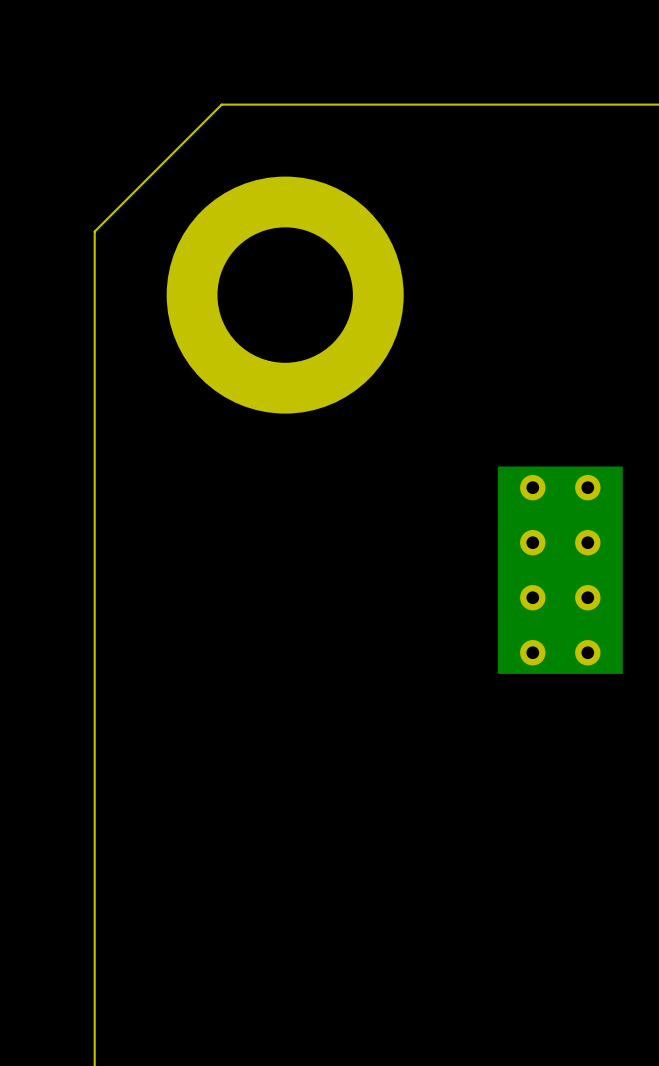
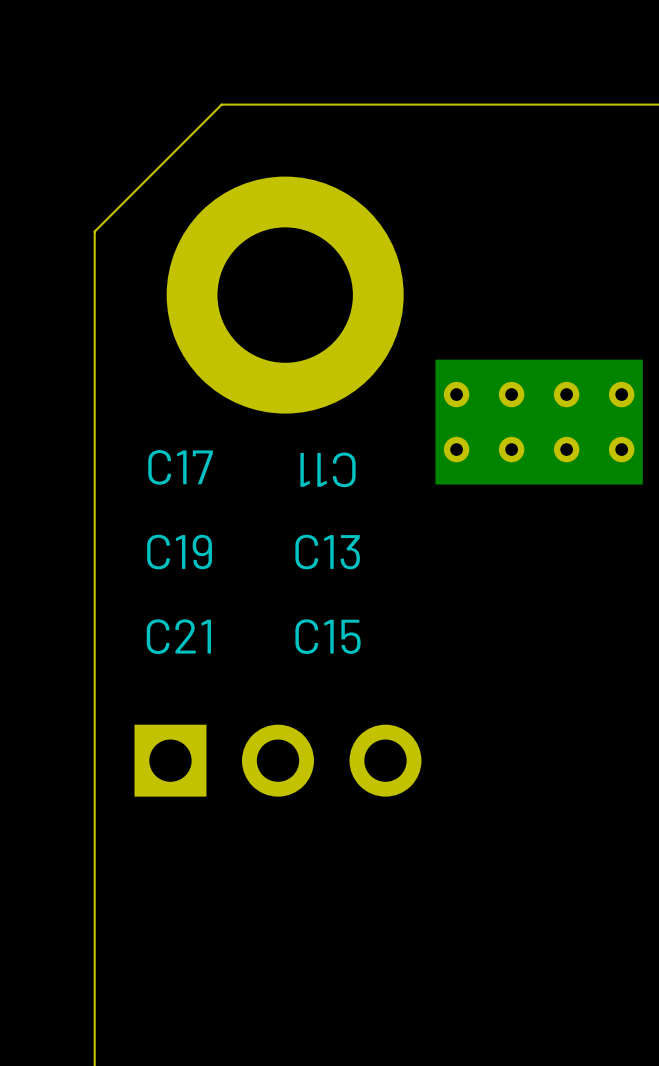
C17: none -> (180, 467)
C11: none -> (328, 469)
C19: none -> (179, 552)
C13: none -> (327, 552)
part rotation: 0° (560, 570) -> 90° clockwise (539, 422)
part position: (560, 570) -> (539, 422)
C21: none -> (178, 636)
C15: none -> (328, 636)
part: none -> (277, 760)

